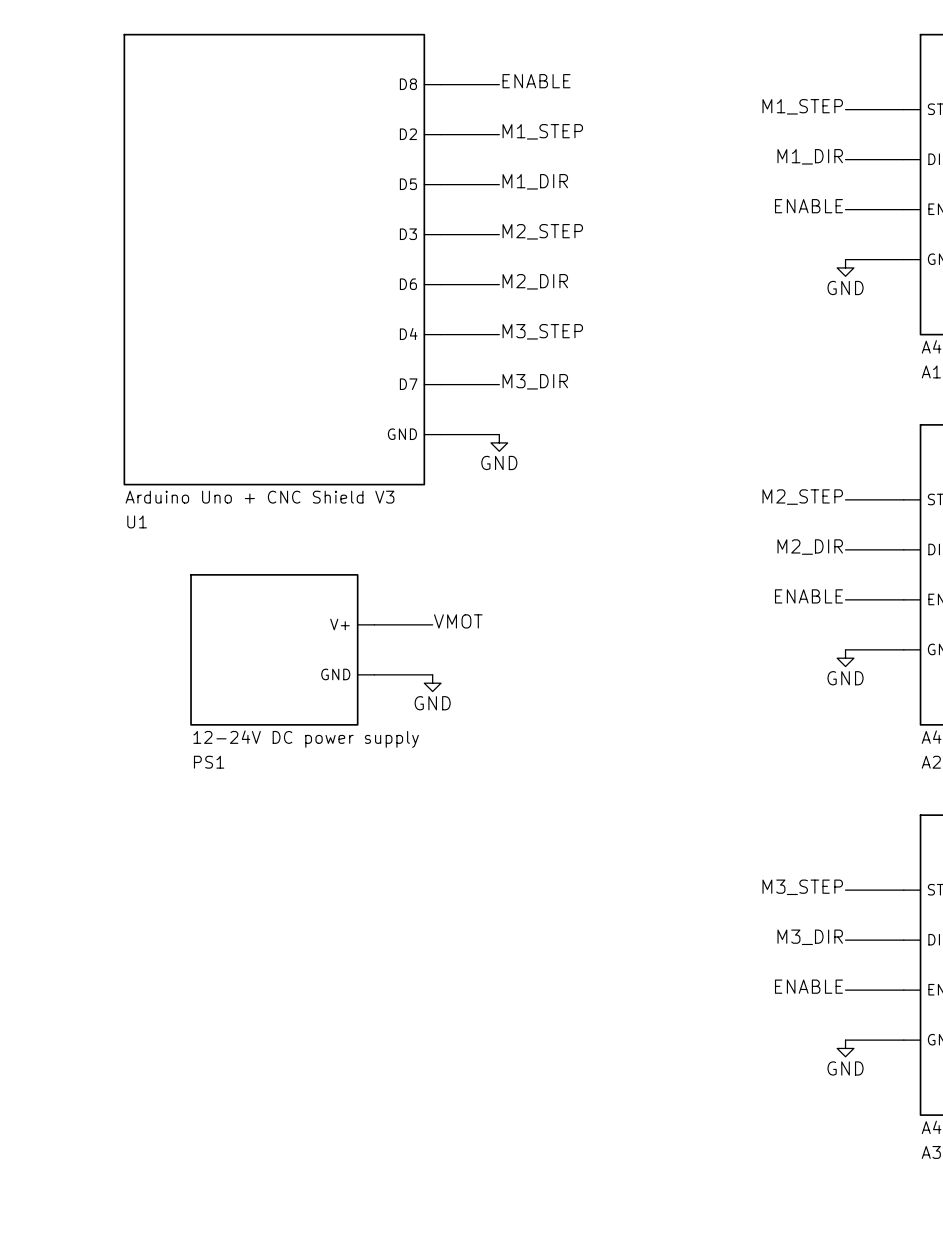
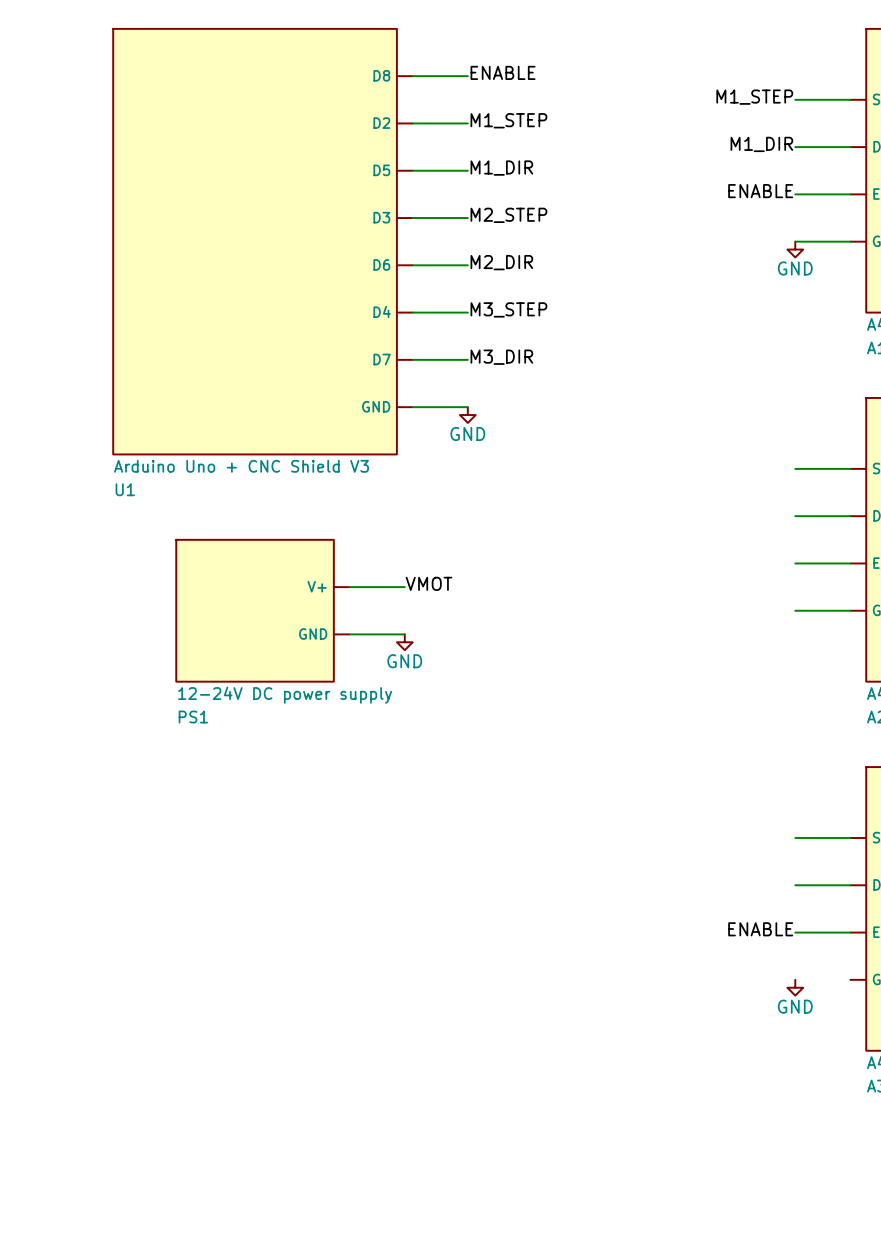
label: M2_STEP (802, 497) -> none
label: M2_DIR (810, 547) -> none
label: ENABLE (808, 596) -> none
power symbol: GND (845, 658) -> none
label: M3_STEP (802, 887) -> none
label: M3_DIR (810, 937) -> none
wire: (845, 1040) (903, 1040) -> none

